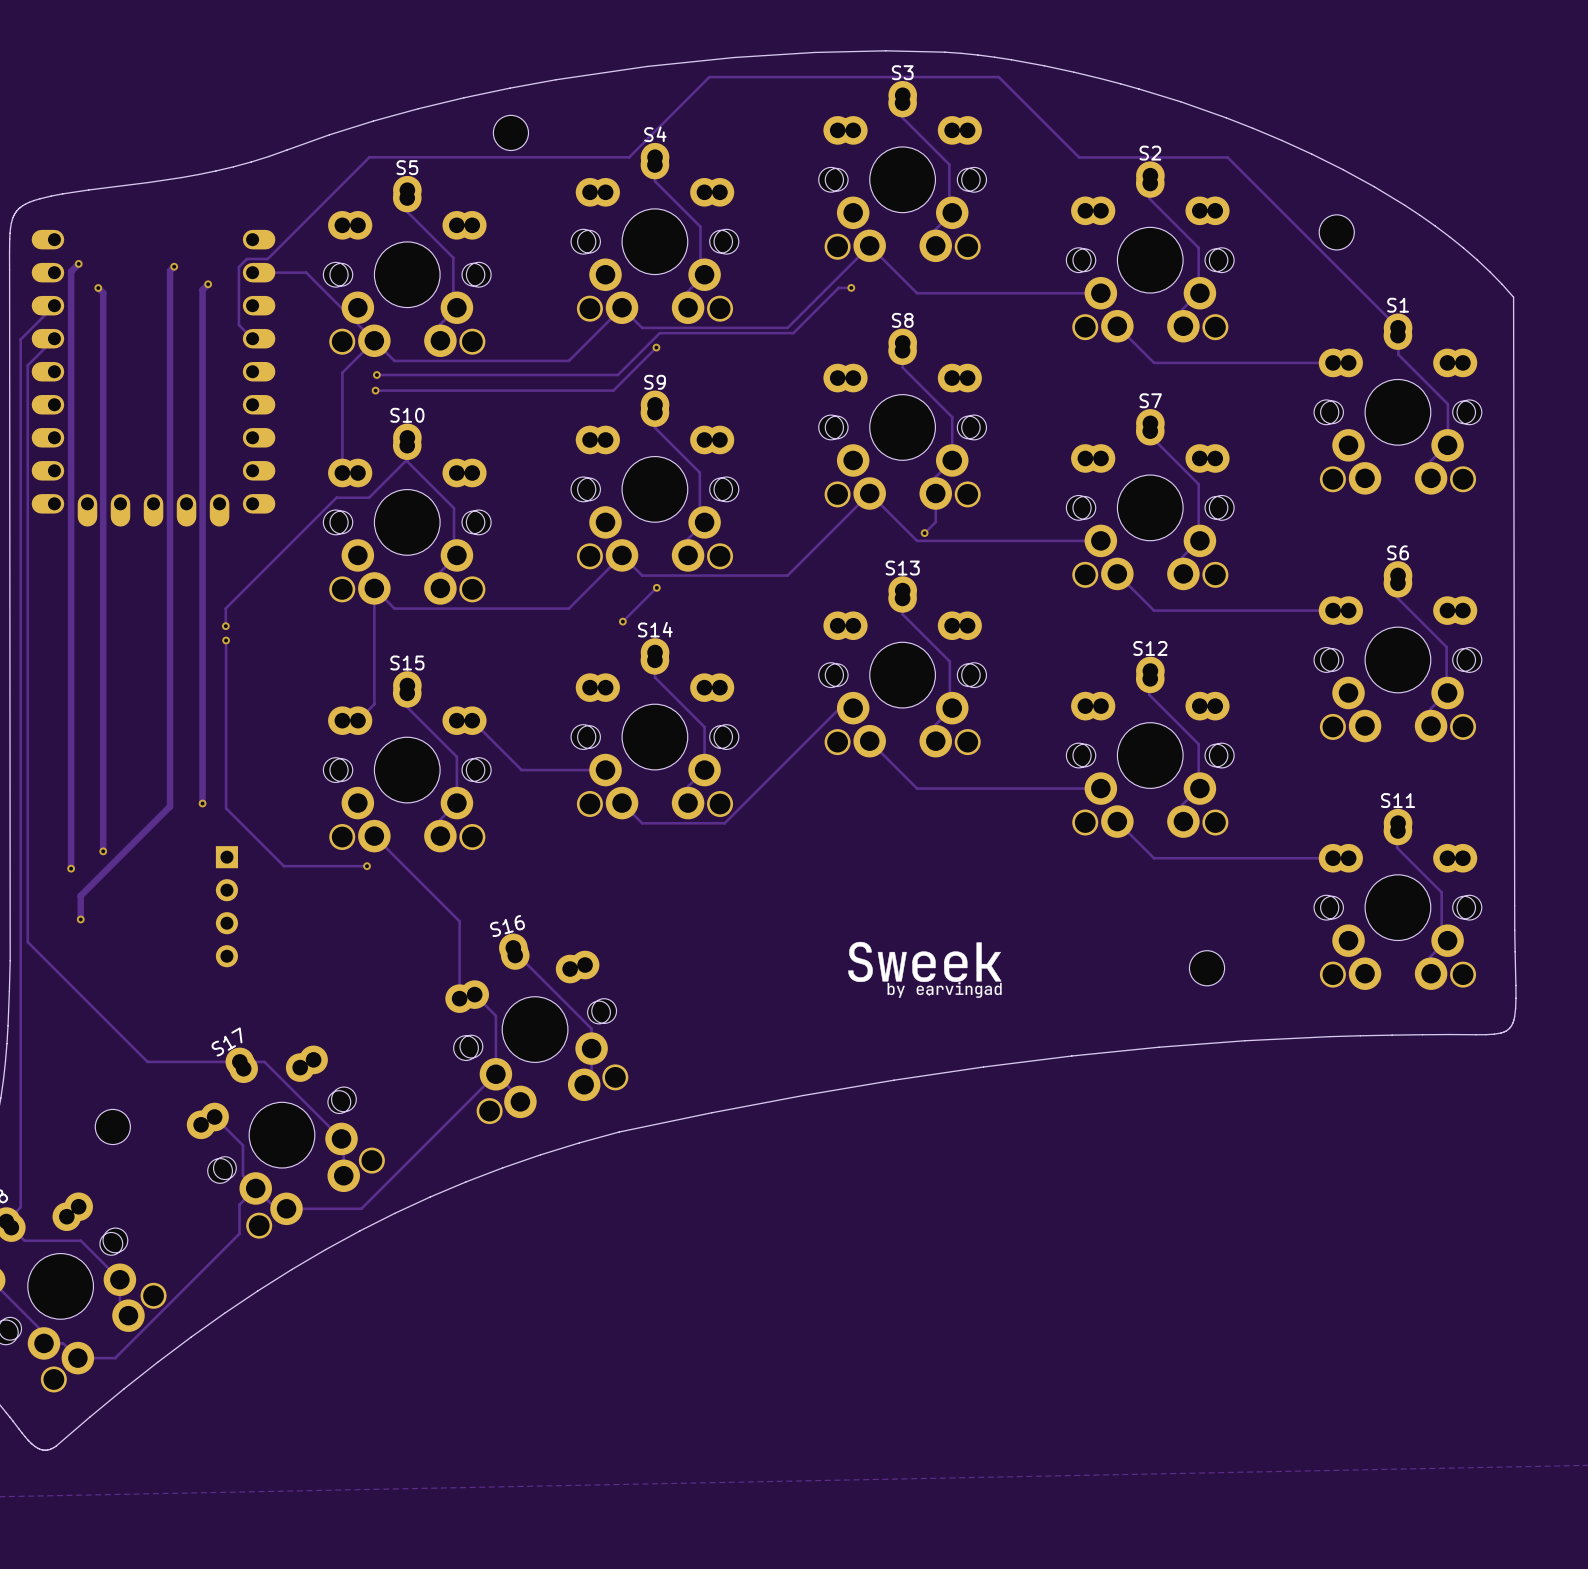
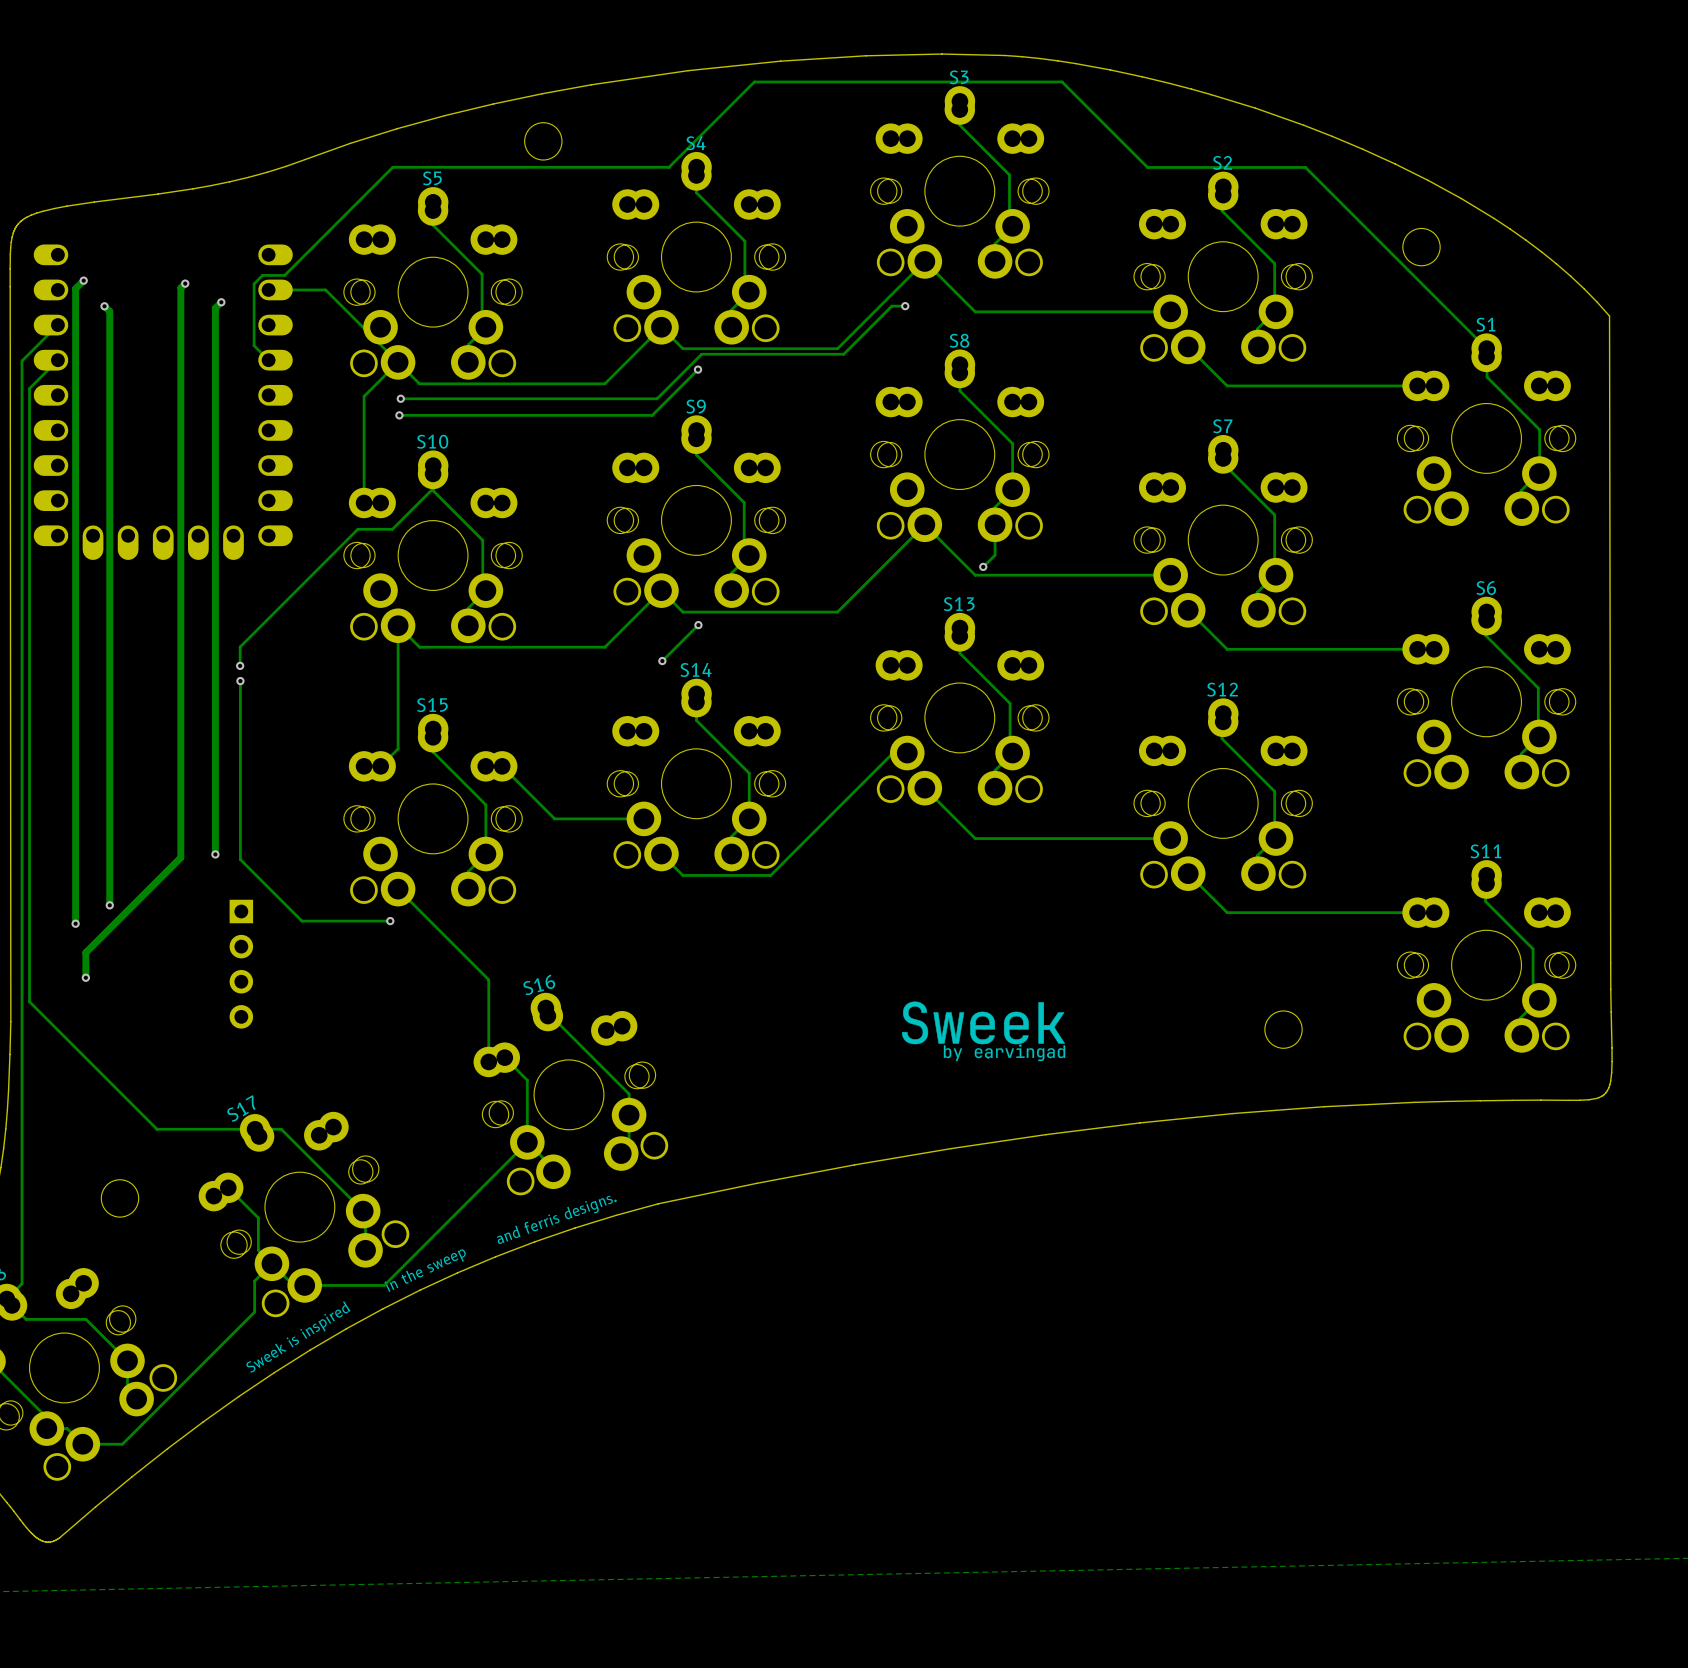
text: none -> and ferris designs. (556, 1219)
text: none -> in the sweep (425, 1270)
text: none -> Sweek is inspired (298, 1336)

